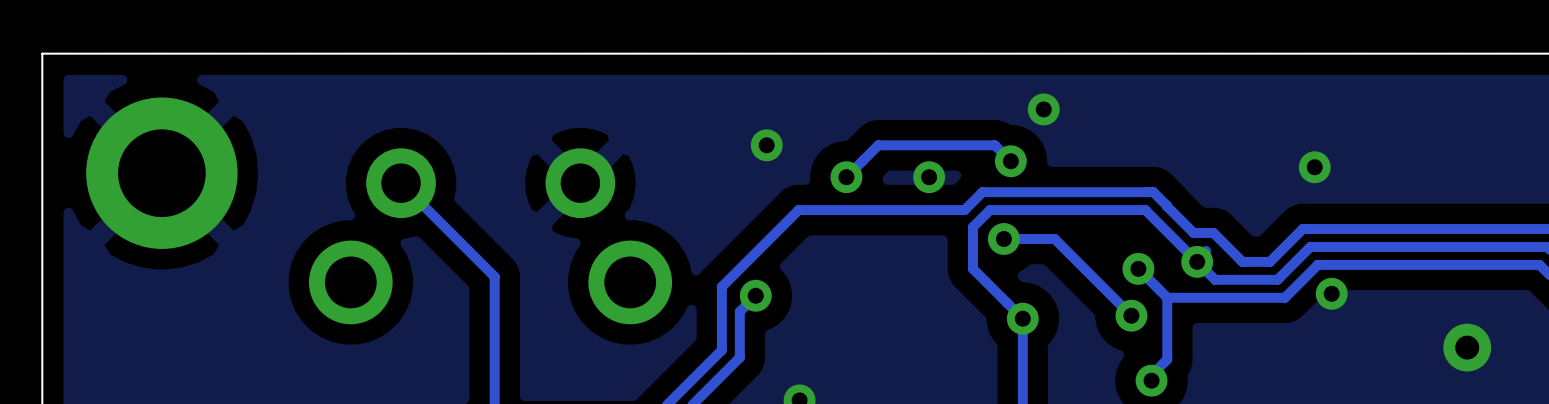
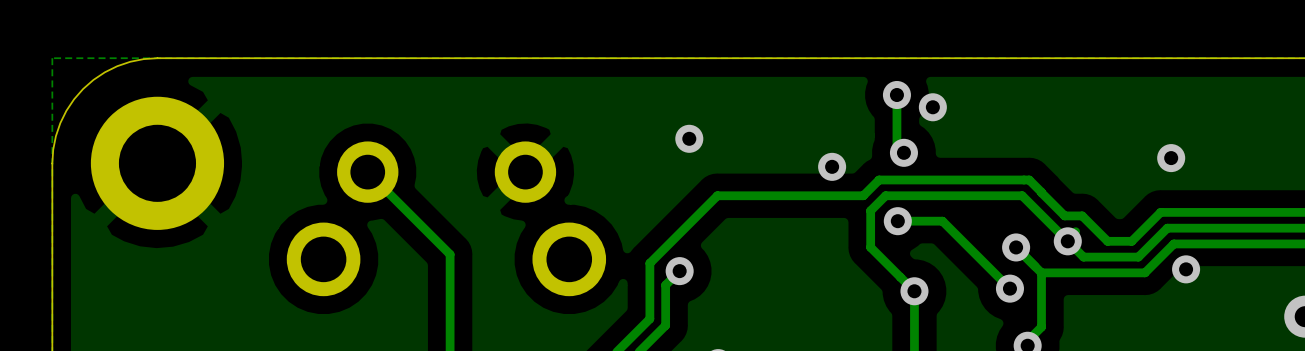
board edge: (161, 53) (42, 53) (42, 173) -> (157, 58) (130, 61) (117, 66) (104, 72) (83, 89) (66, 110) (60, 123) (53, 149) (52, 163)
track: (1002, 153) (994, 145) (878, 145) (846, 177) -> (896, 145) (896, 95)
via position: (846, 177) -> (896, 95)

